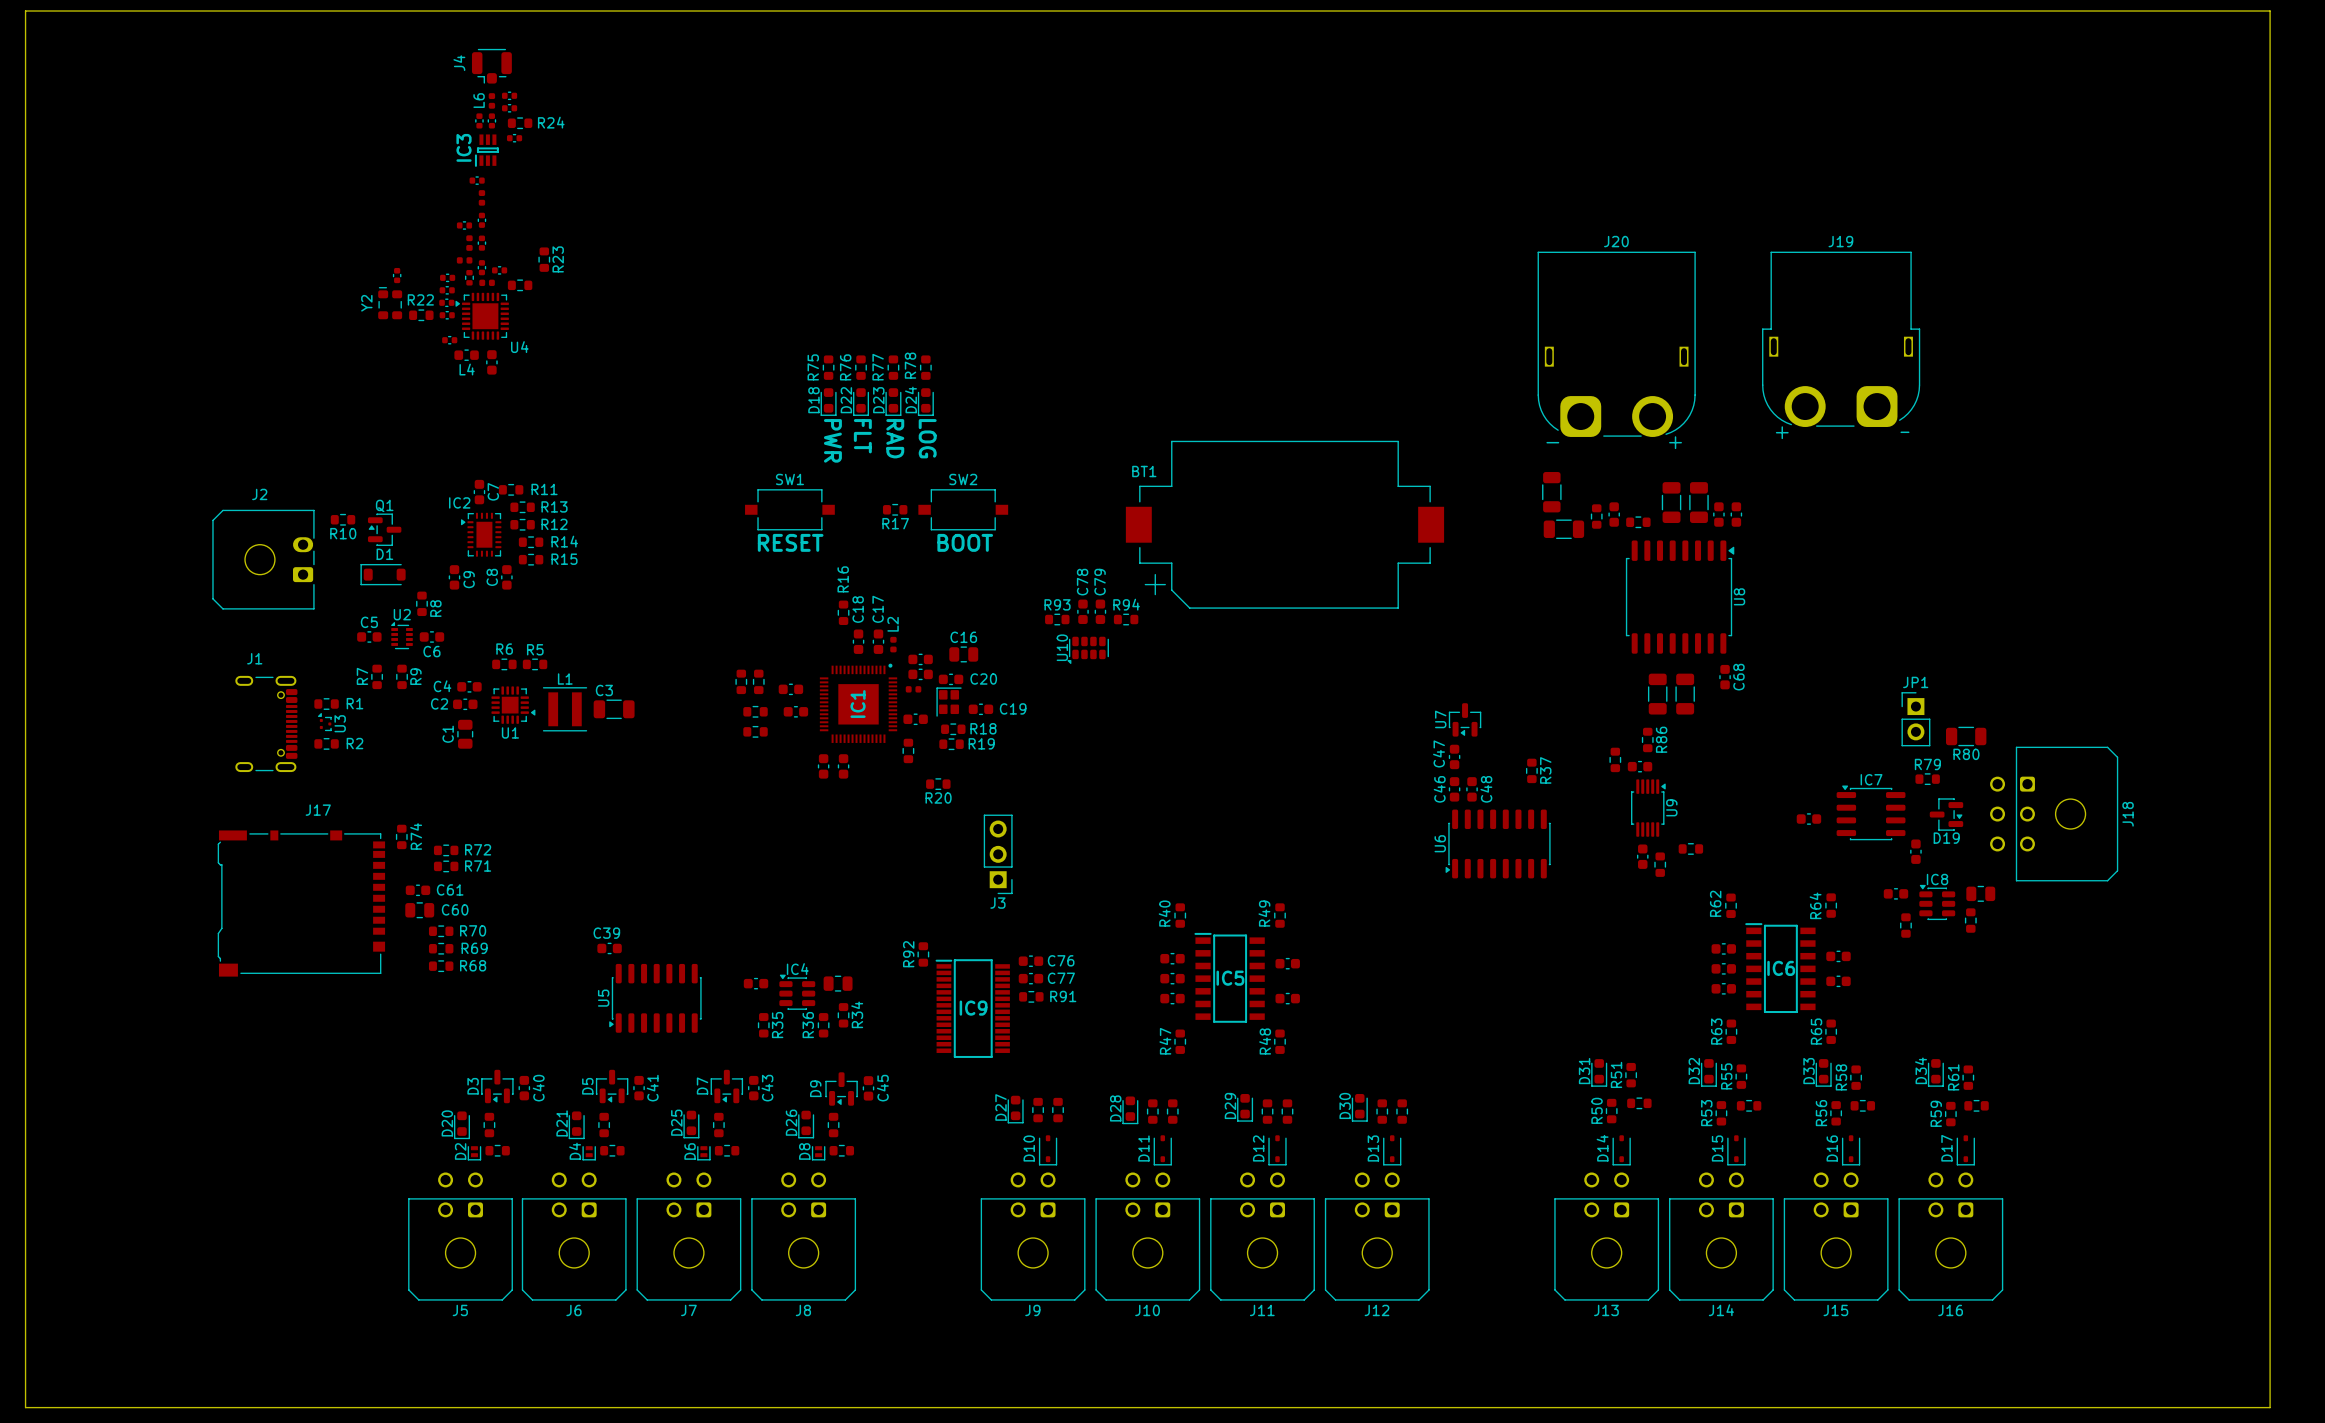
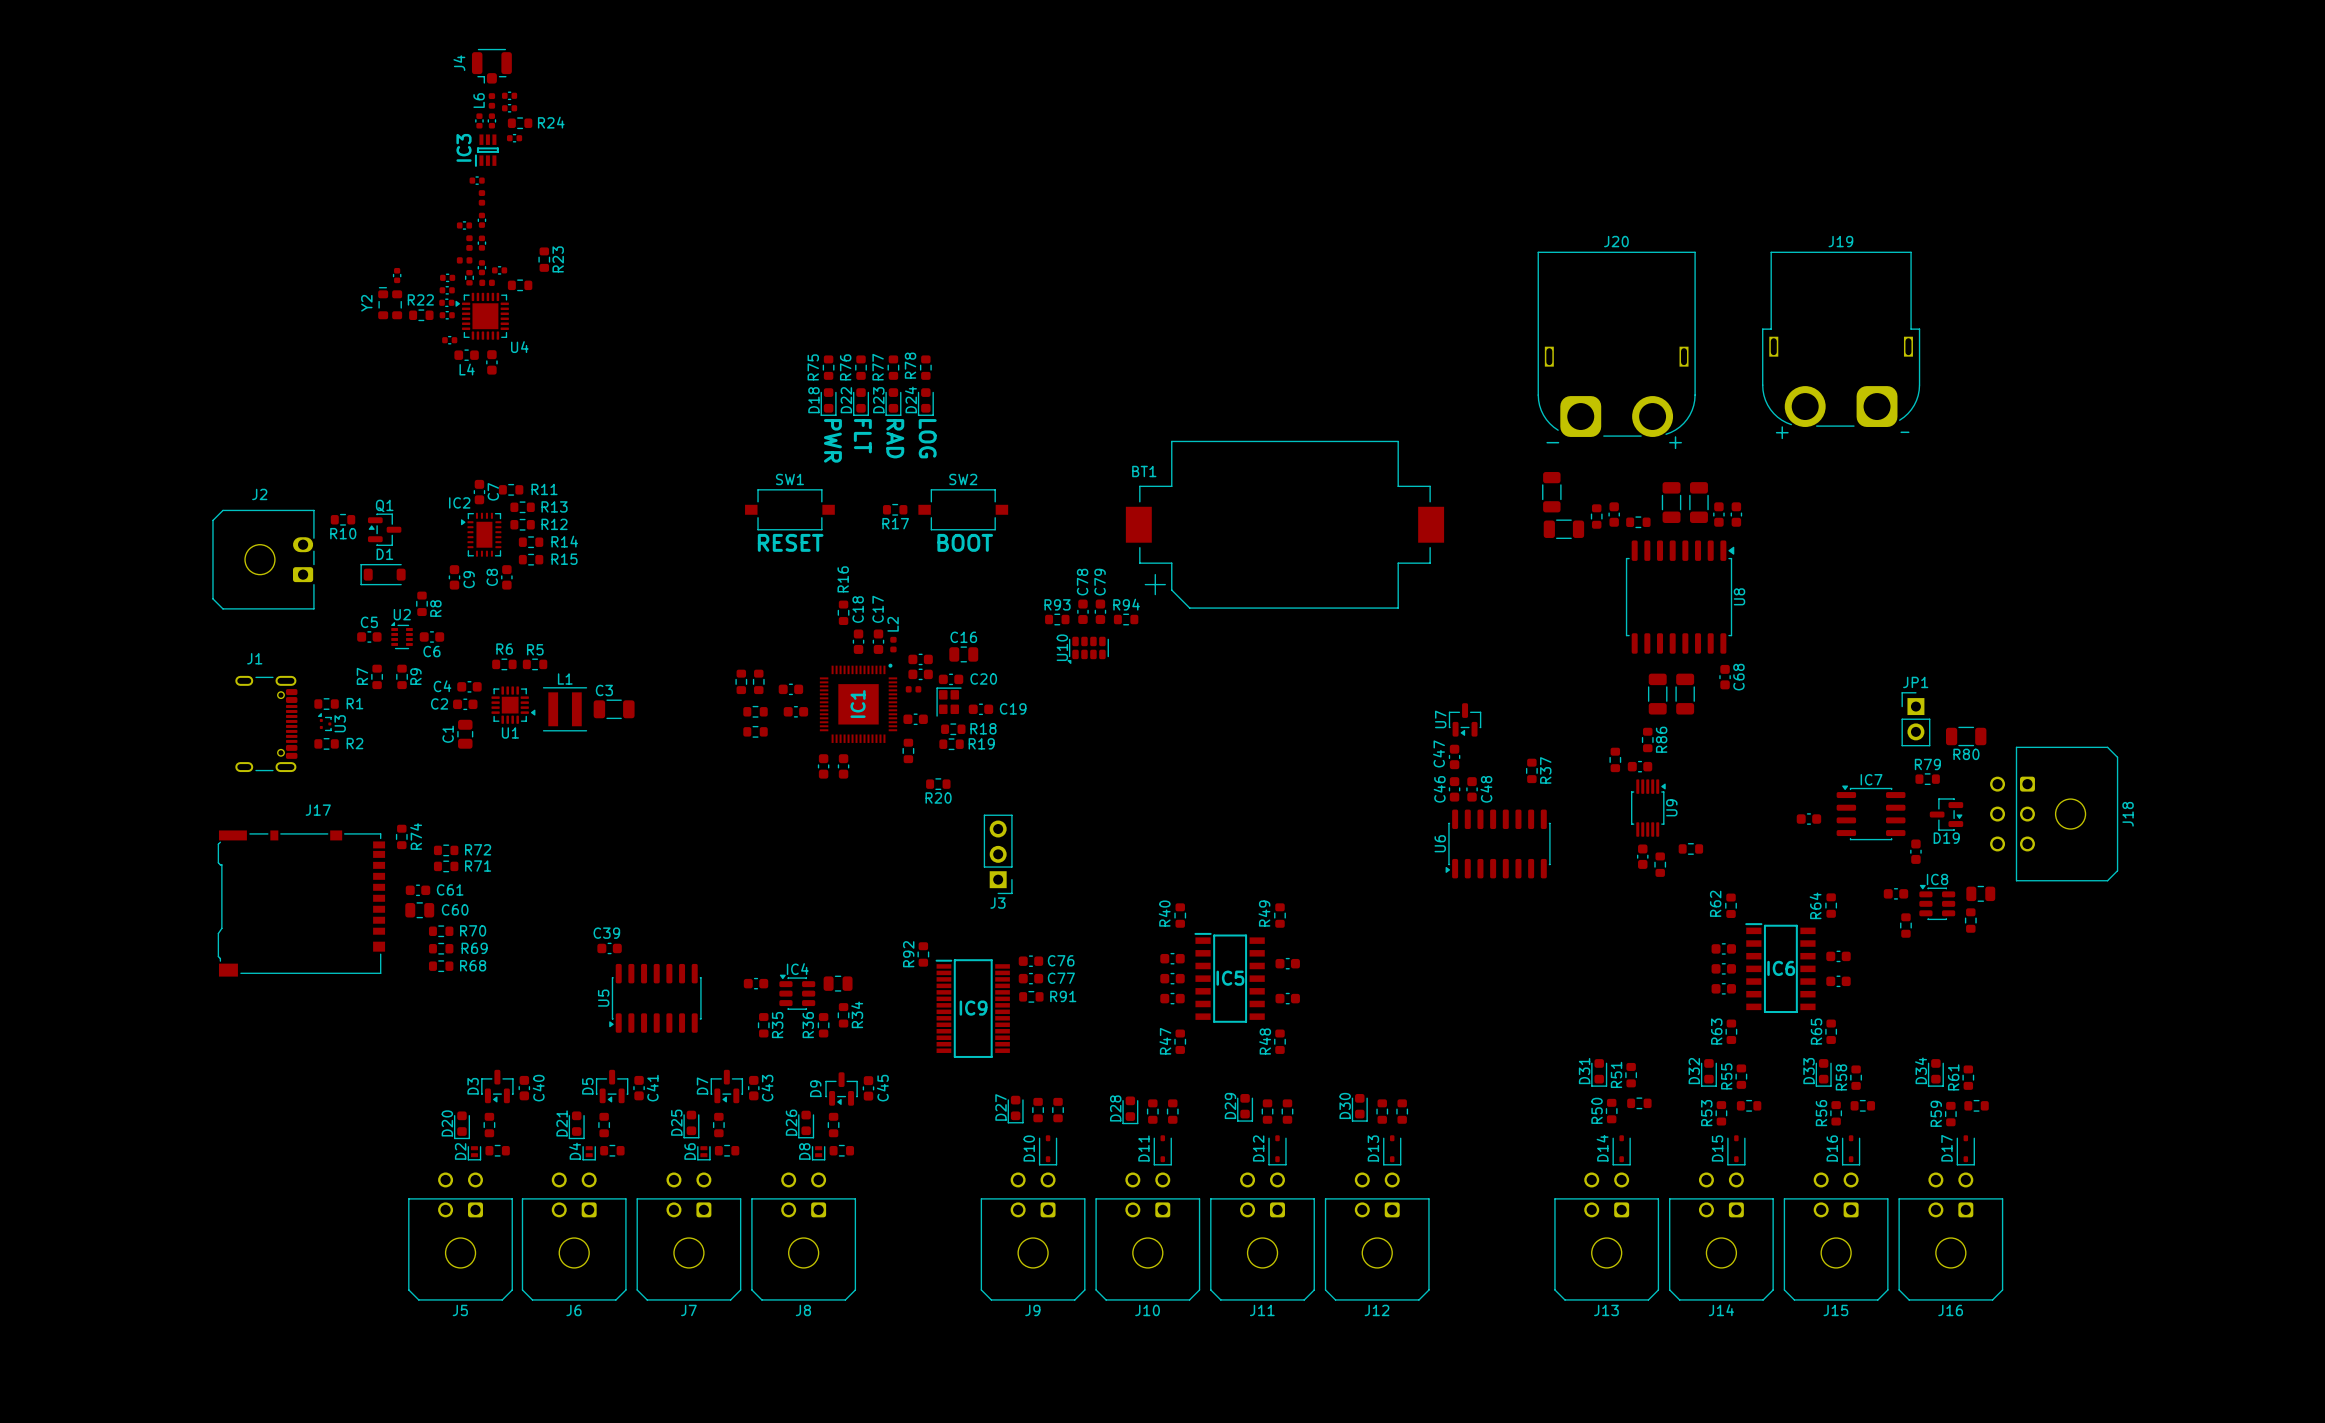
board edge: (25, 11) (2270, 11) (2270, 1407) (25, 1407) (25, 11) -> none

